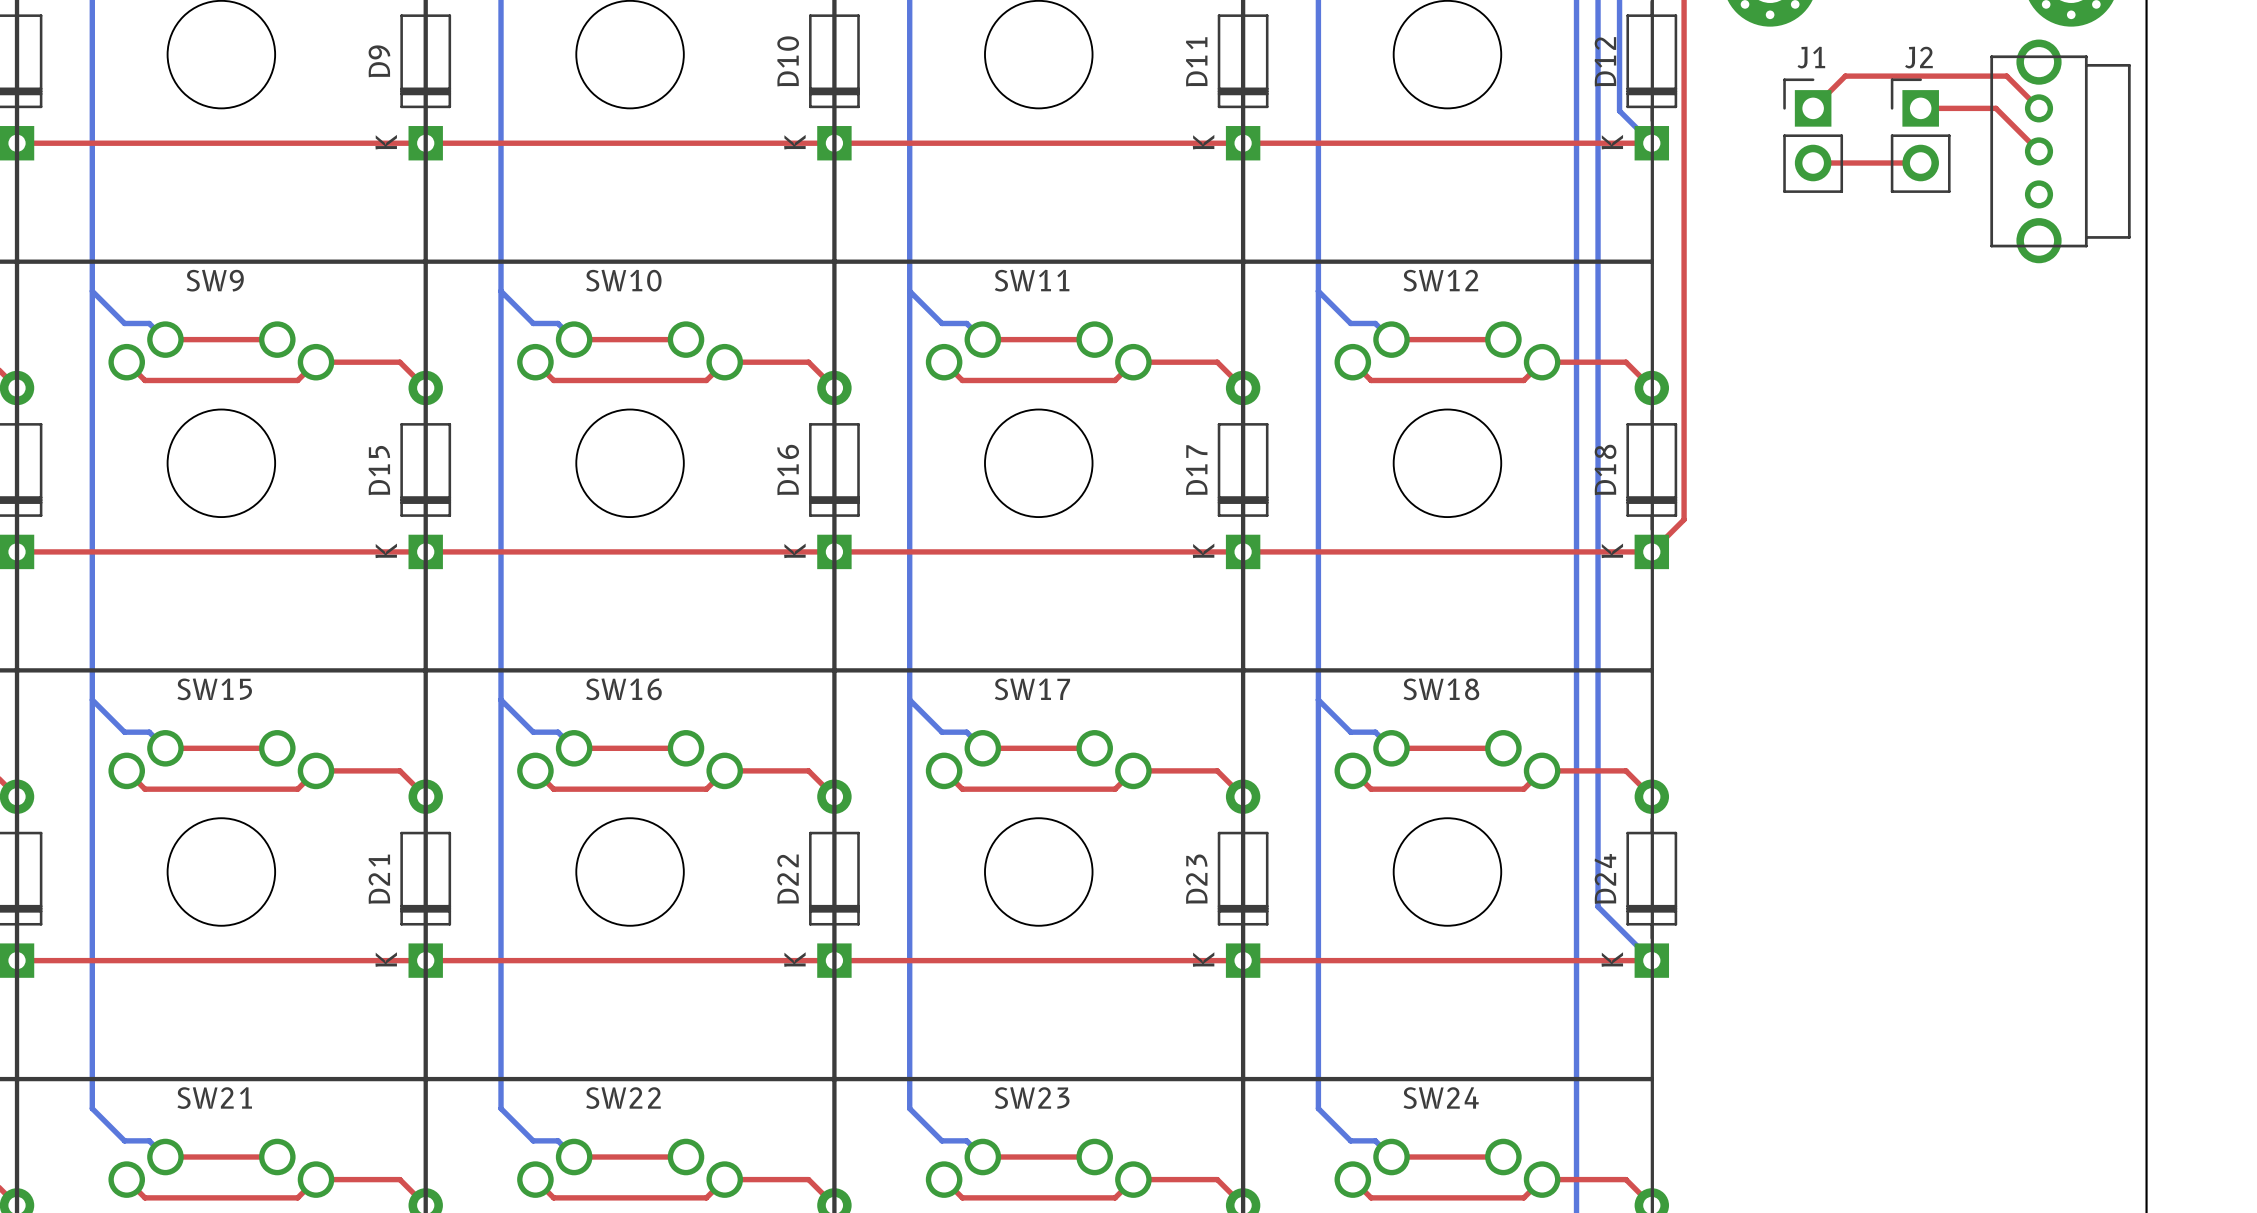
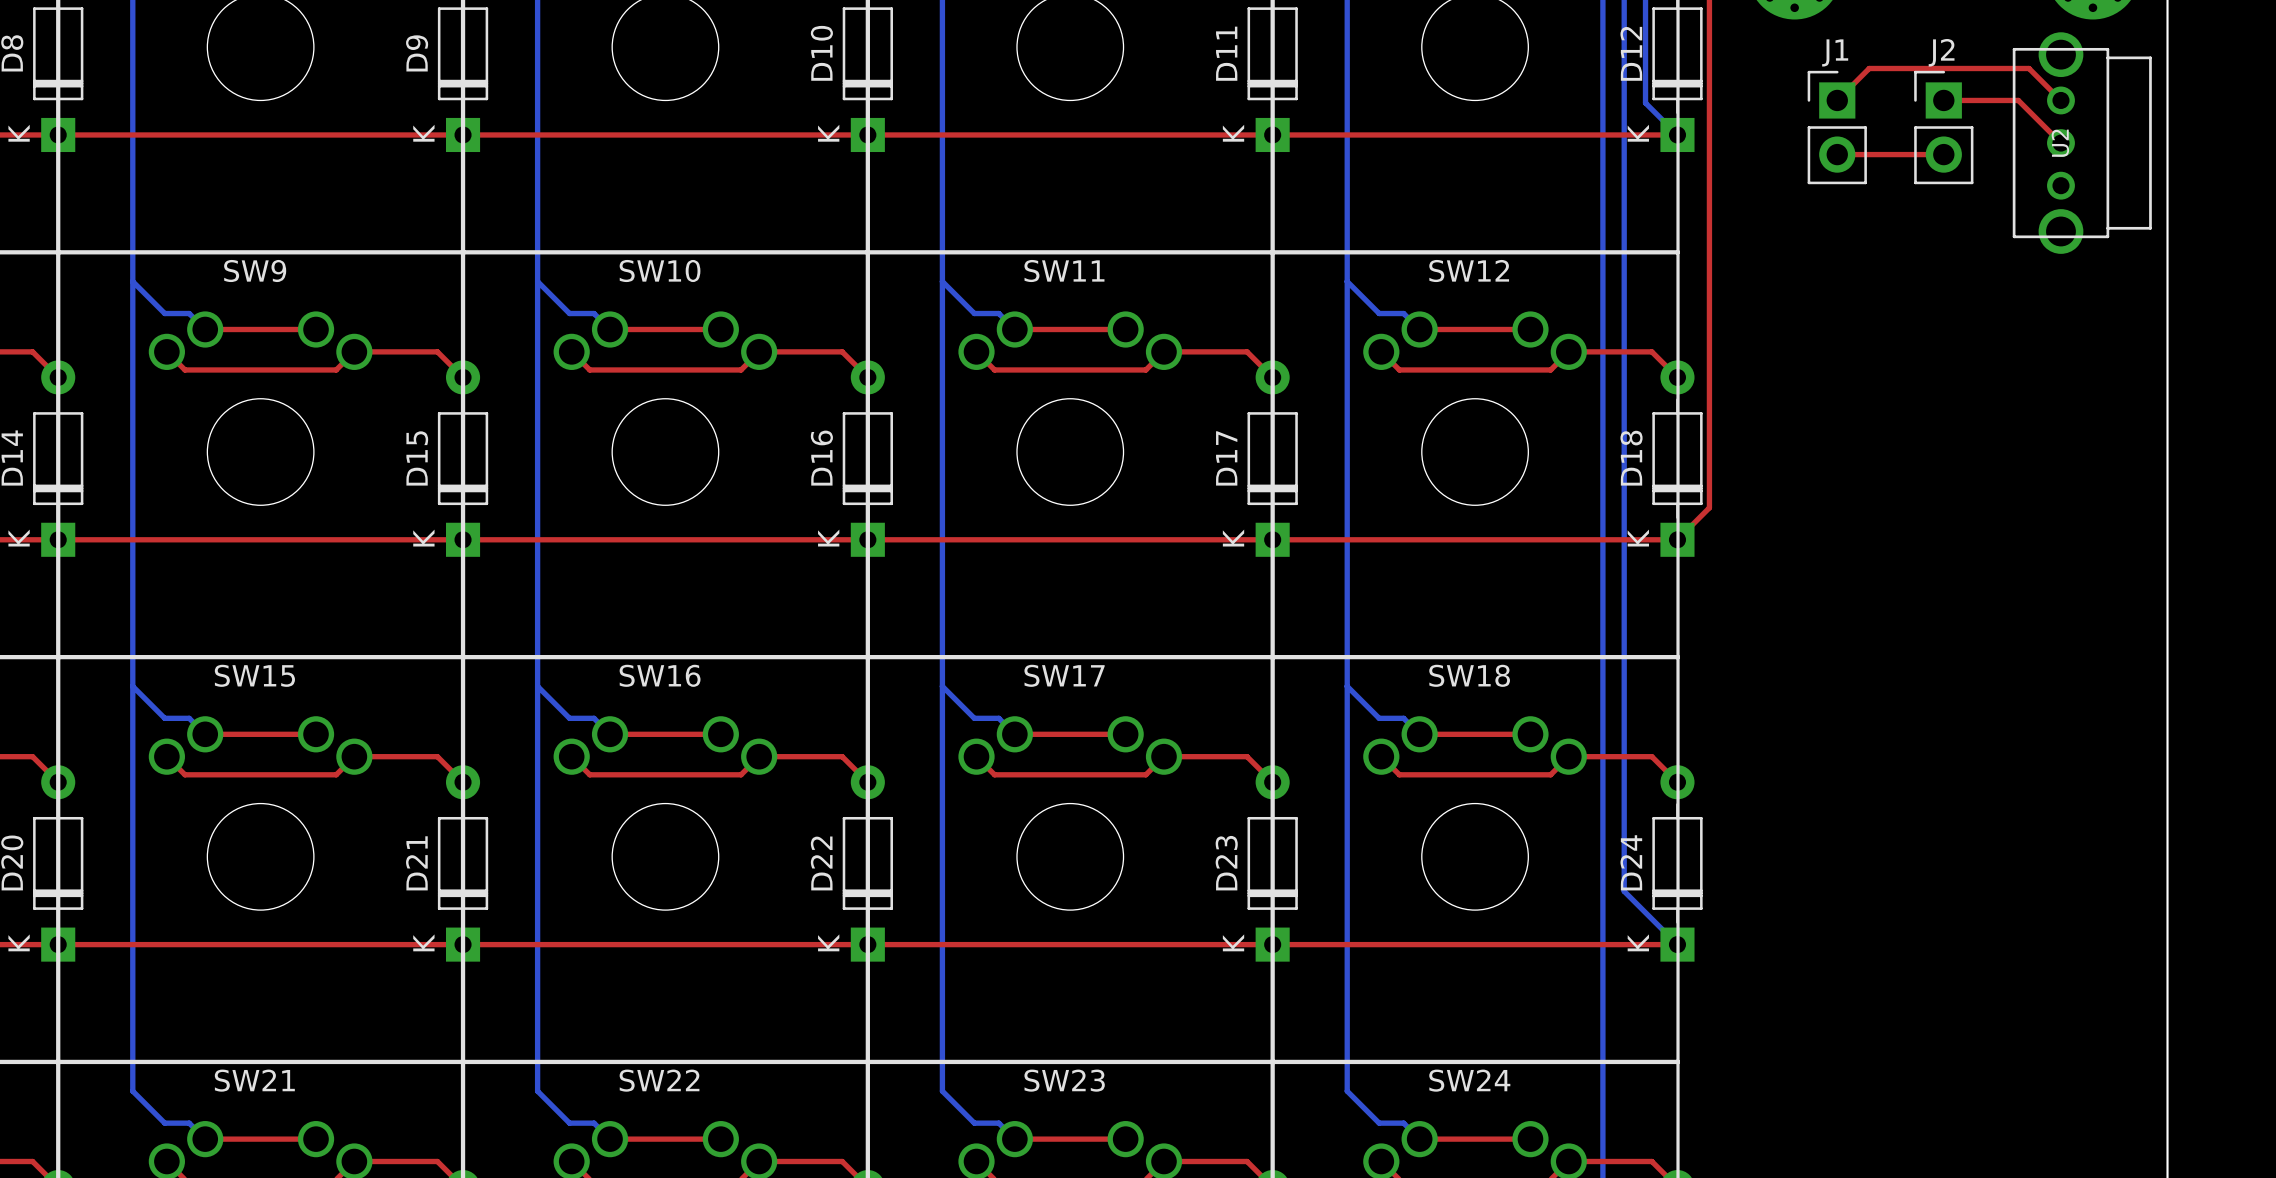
U2 name: none -> U2 (2060, 143)

